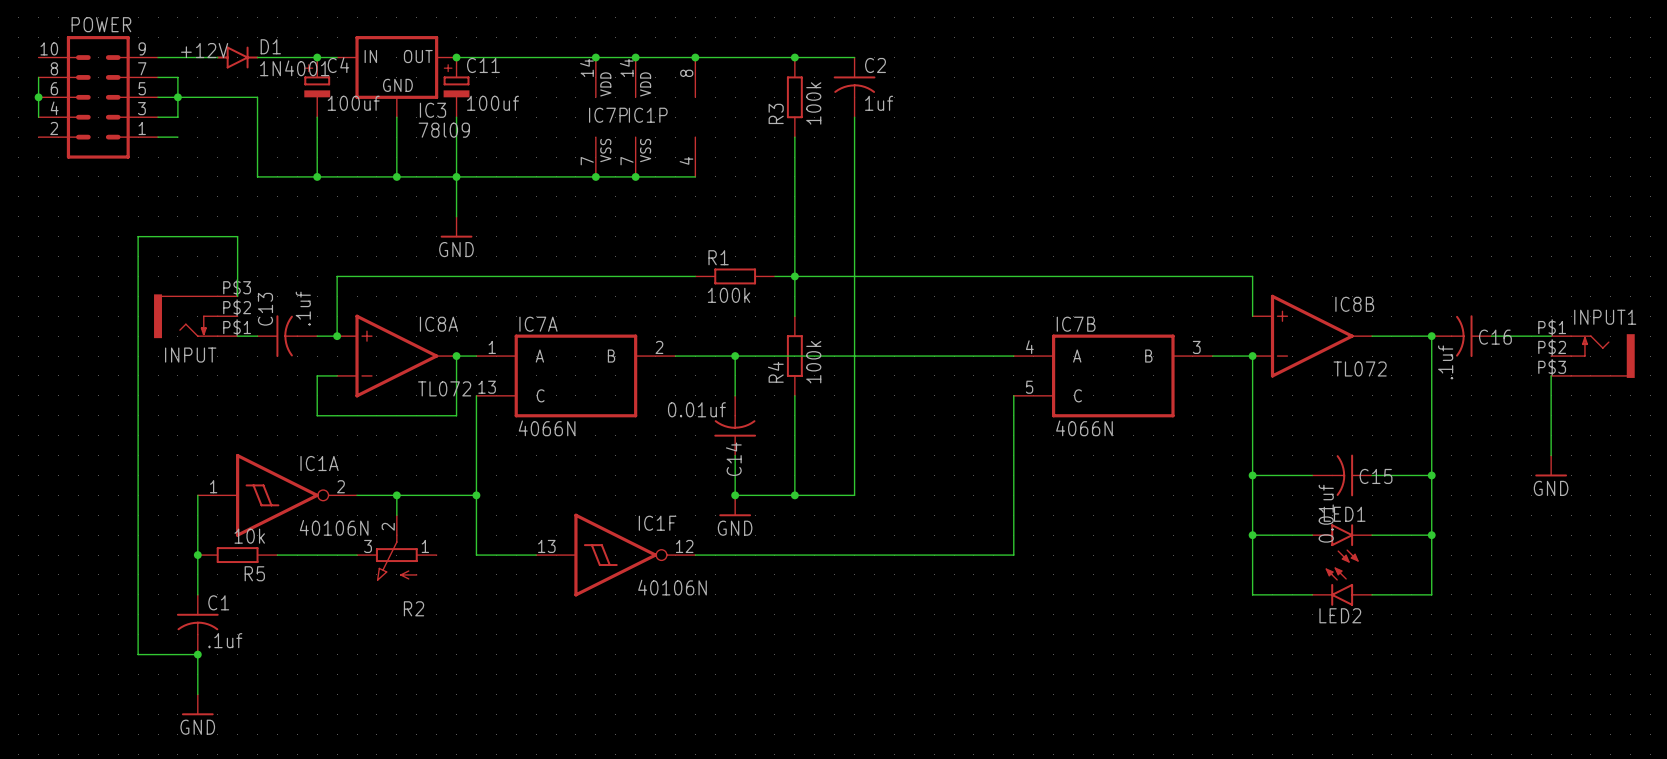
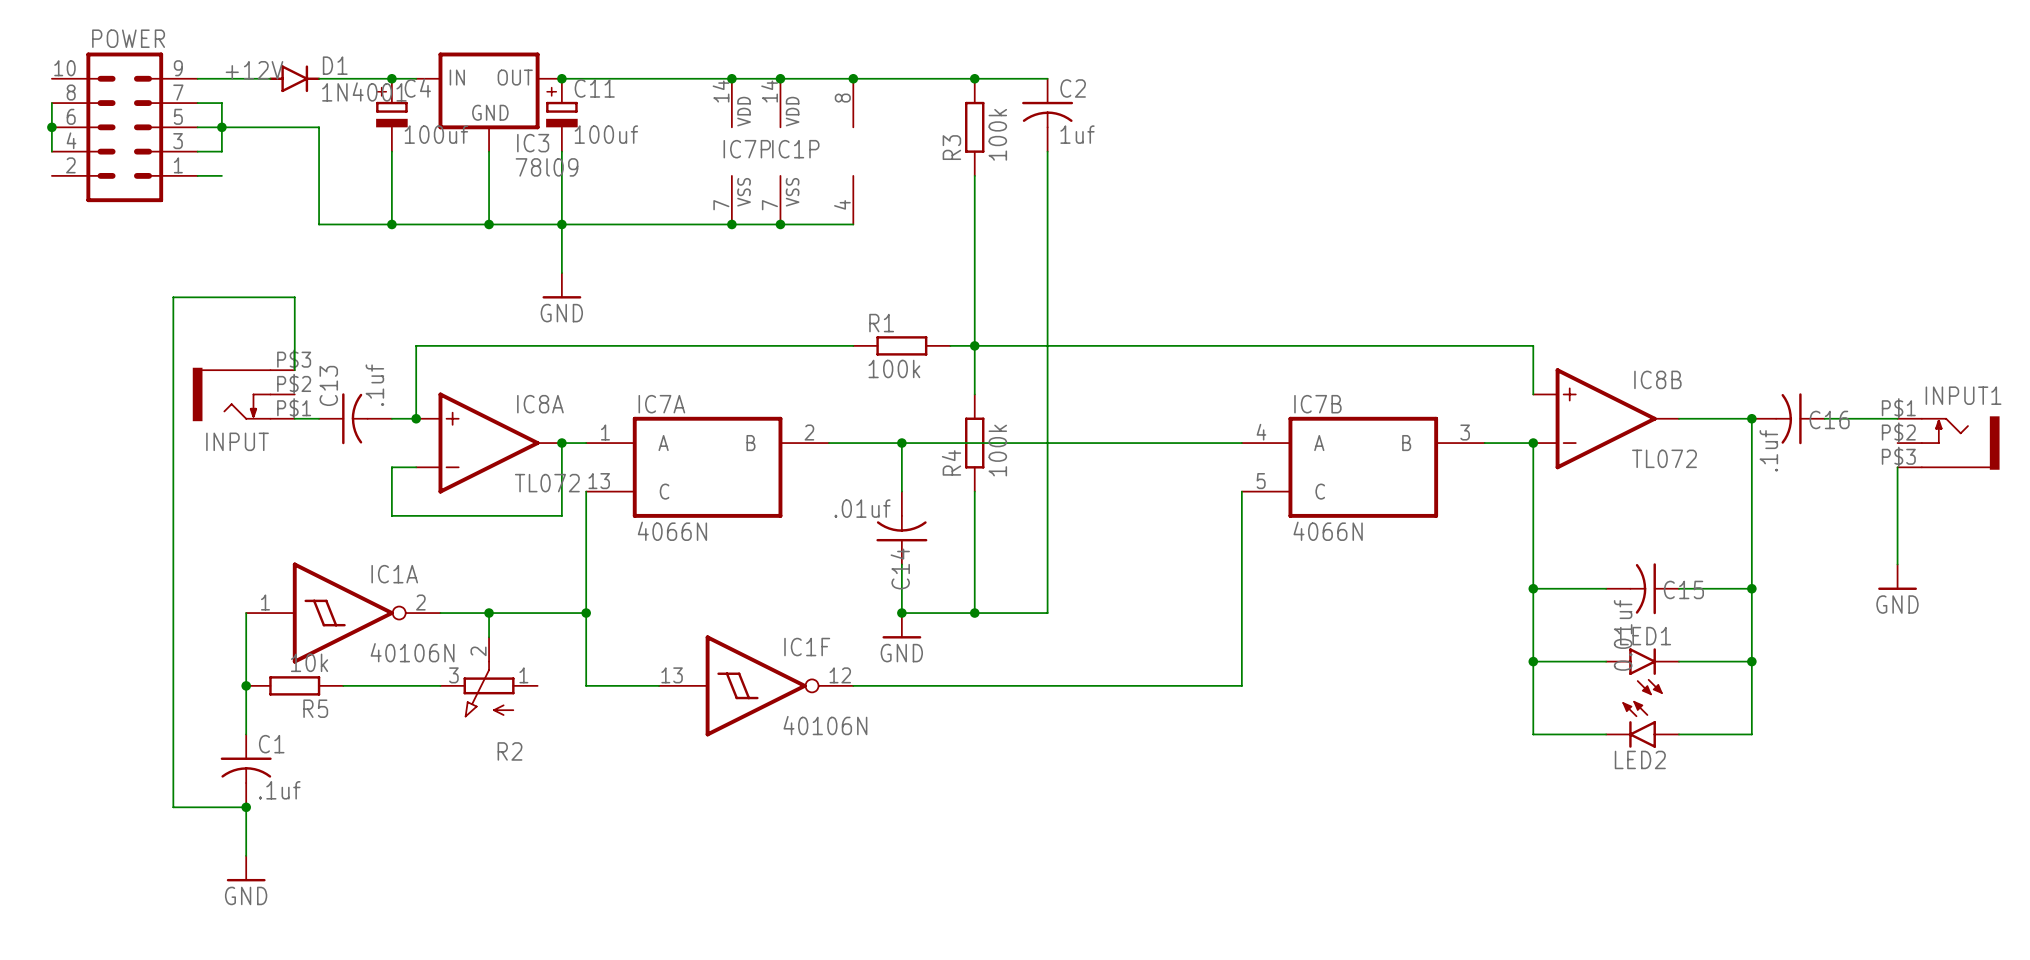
C14 value: 0.01uf (696, 409) -> .01uf (862, 508)

